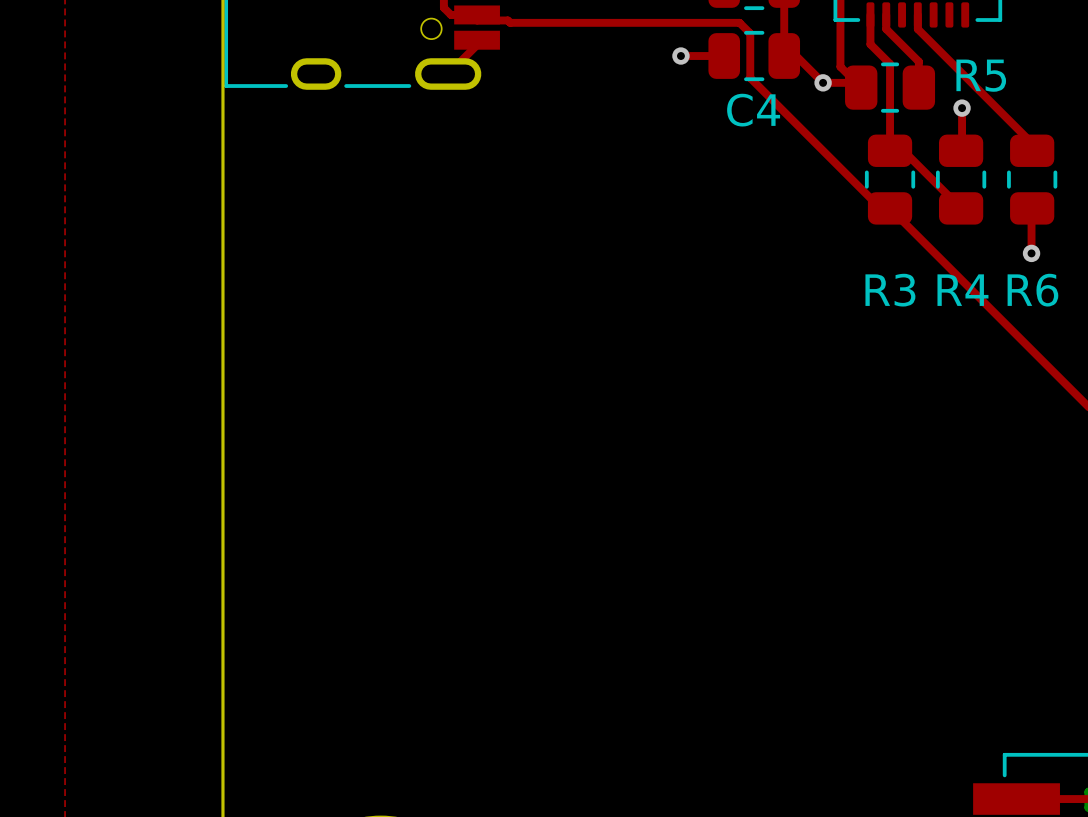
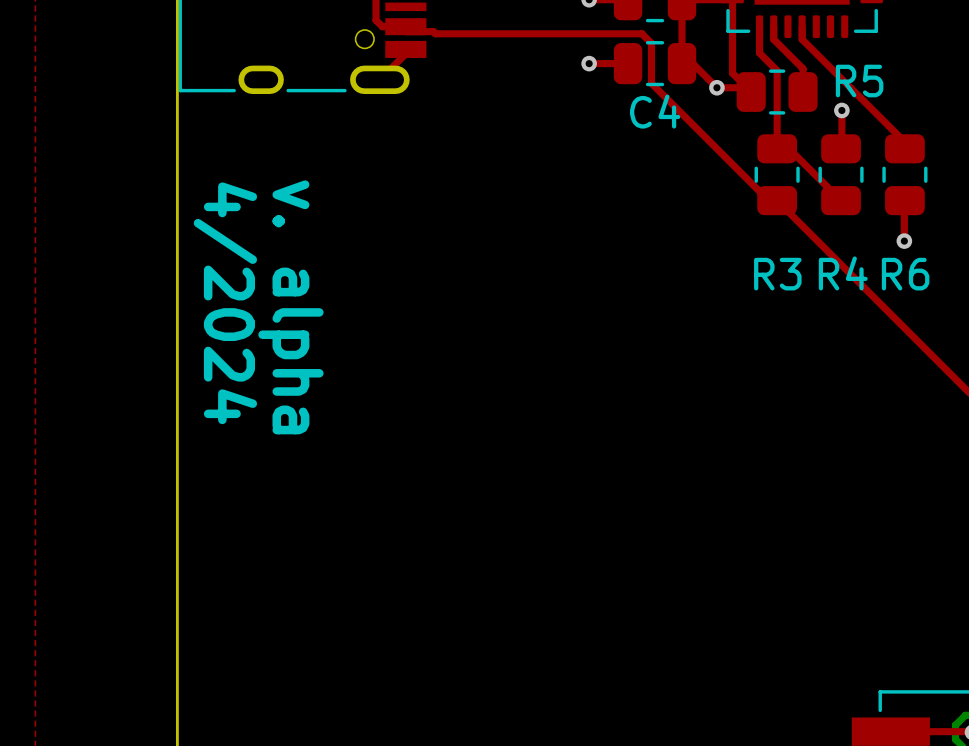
text: none -> 4/2024 (225, 303)
text: none -> v. alpha (290, 307)

